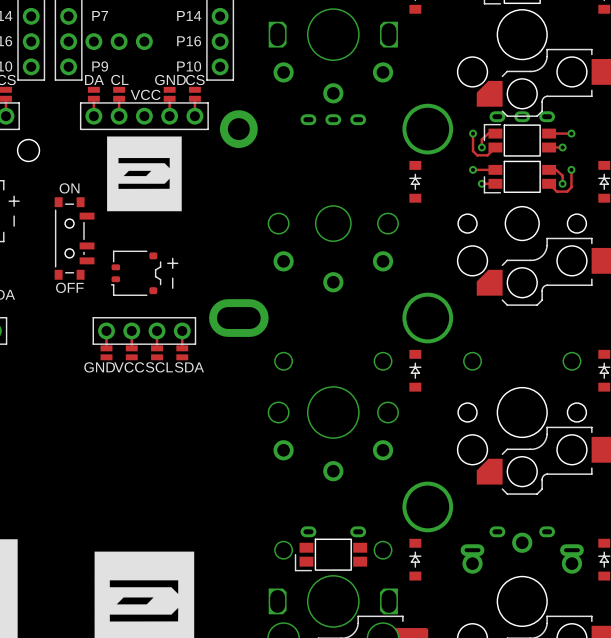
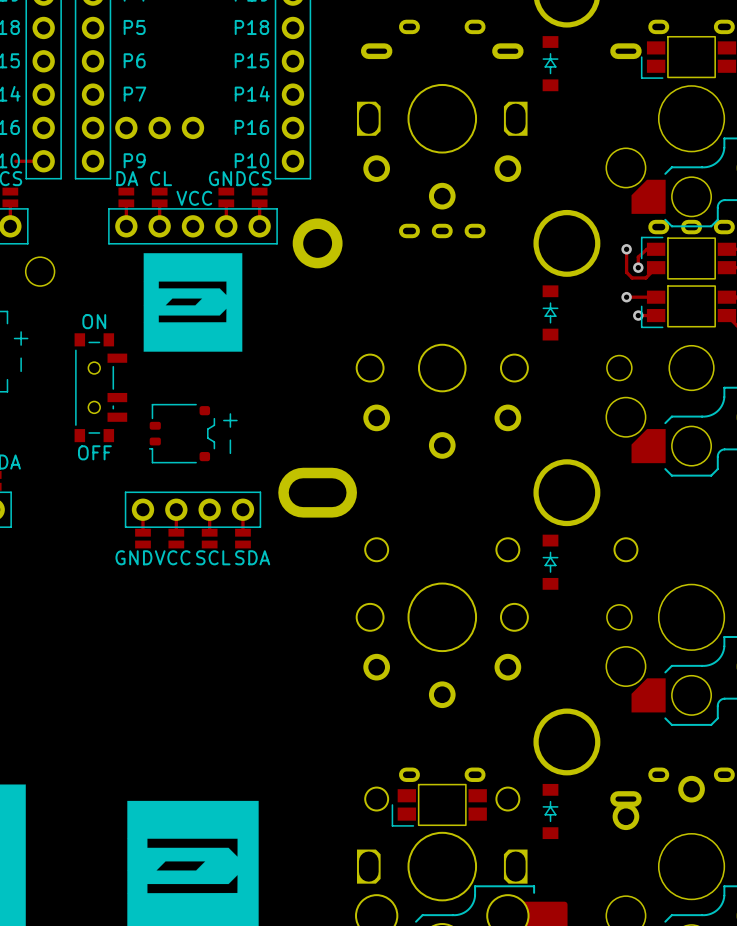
track: none -> (15, 161) (43, 161)

